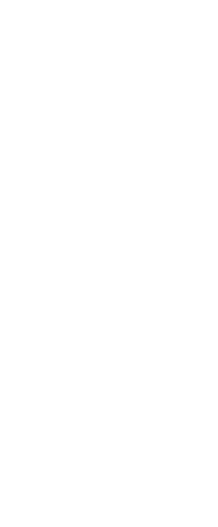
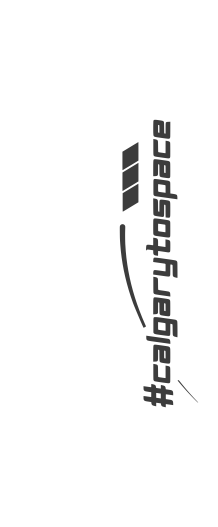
drawing: none -> [119, 119, 199, 408]

